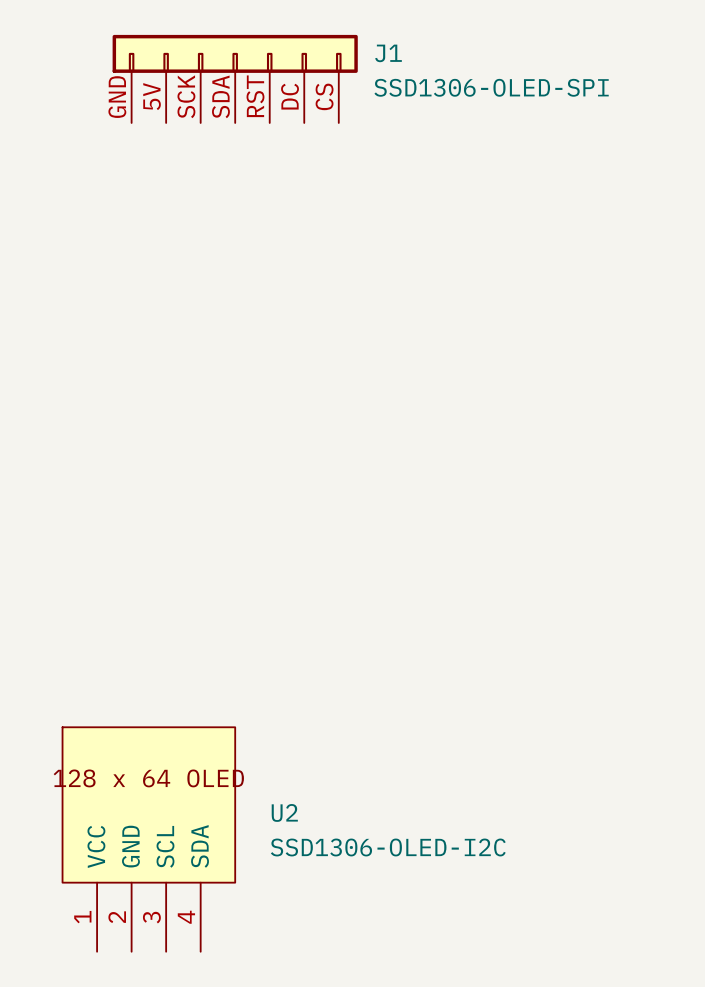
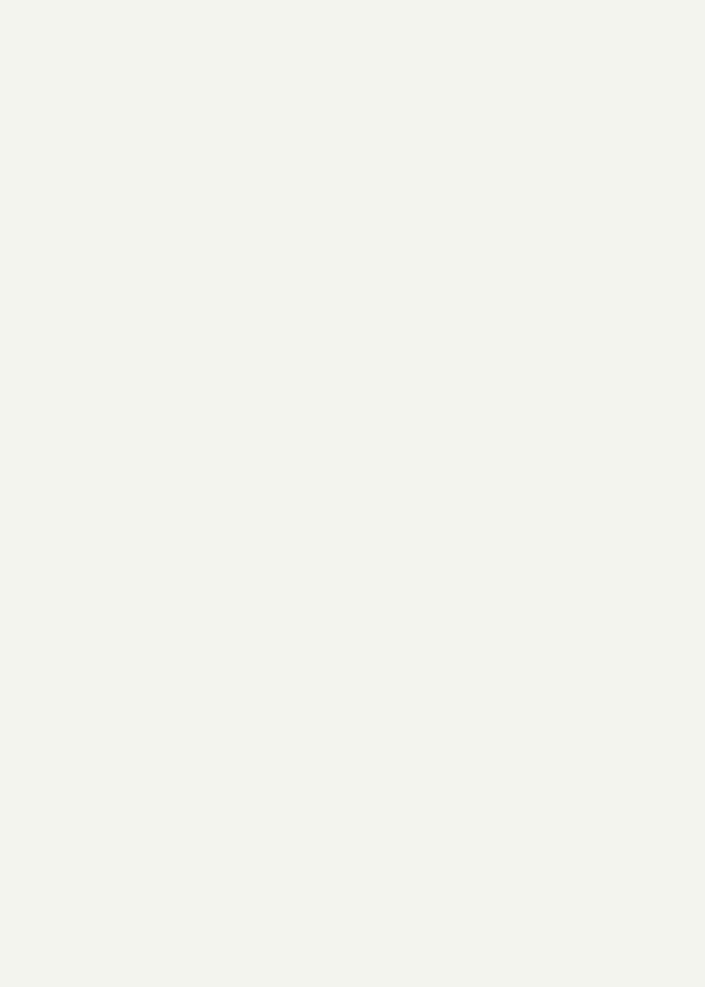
J1: SSD1306-OLED-SPI (235, 78) -> none
U2: SSD1306-OLED-I2C (148, 839) -> none

